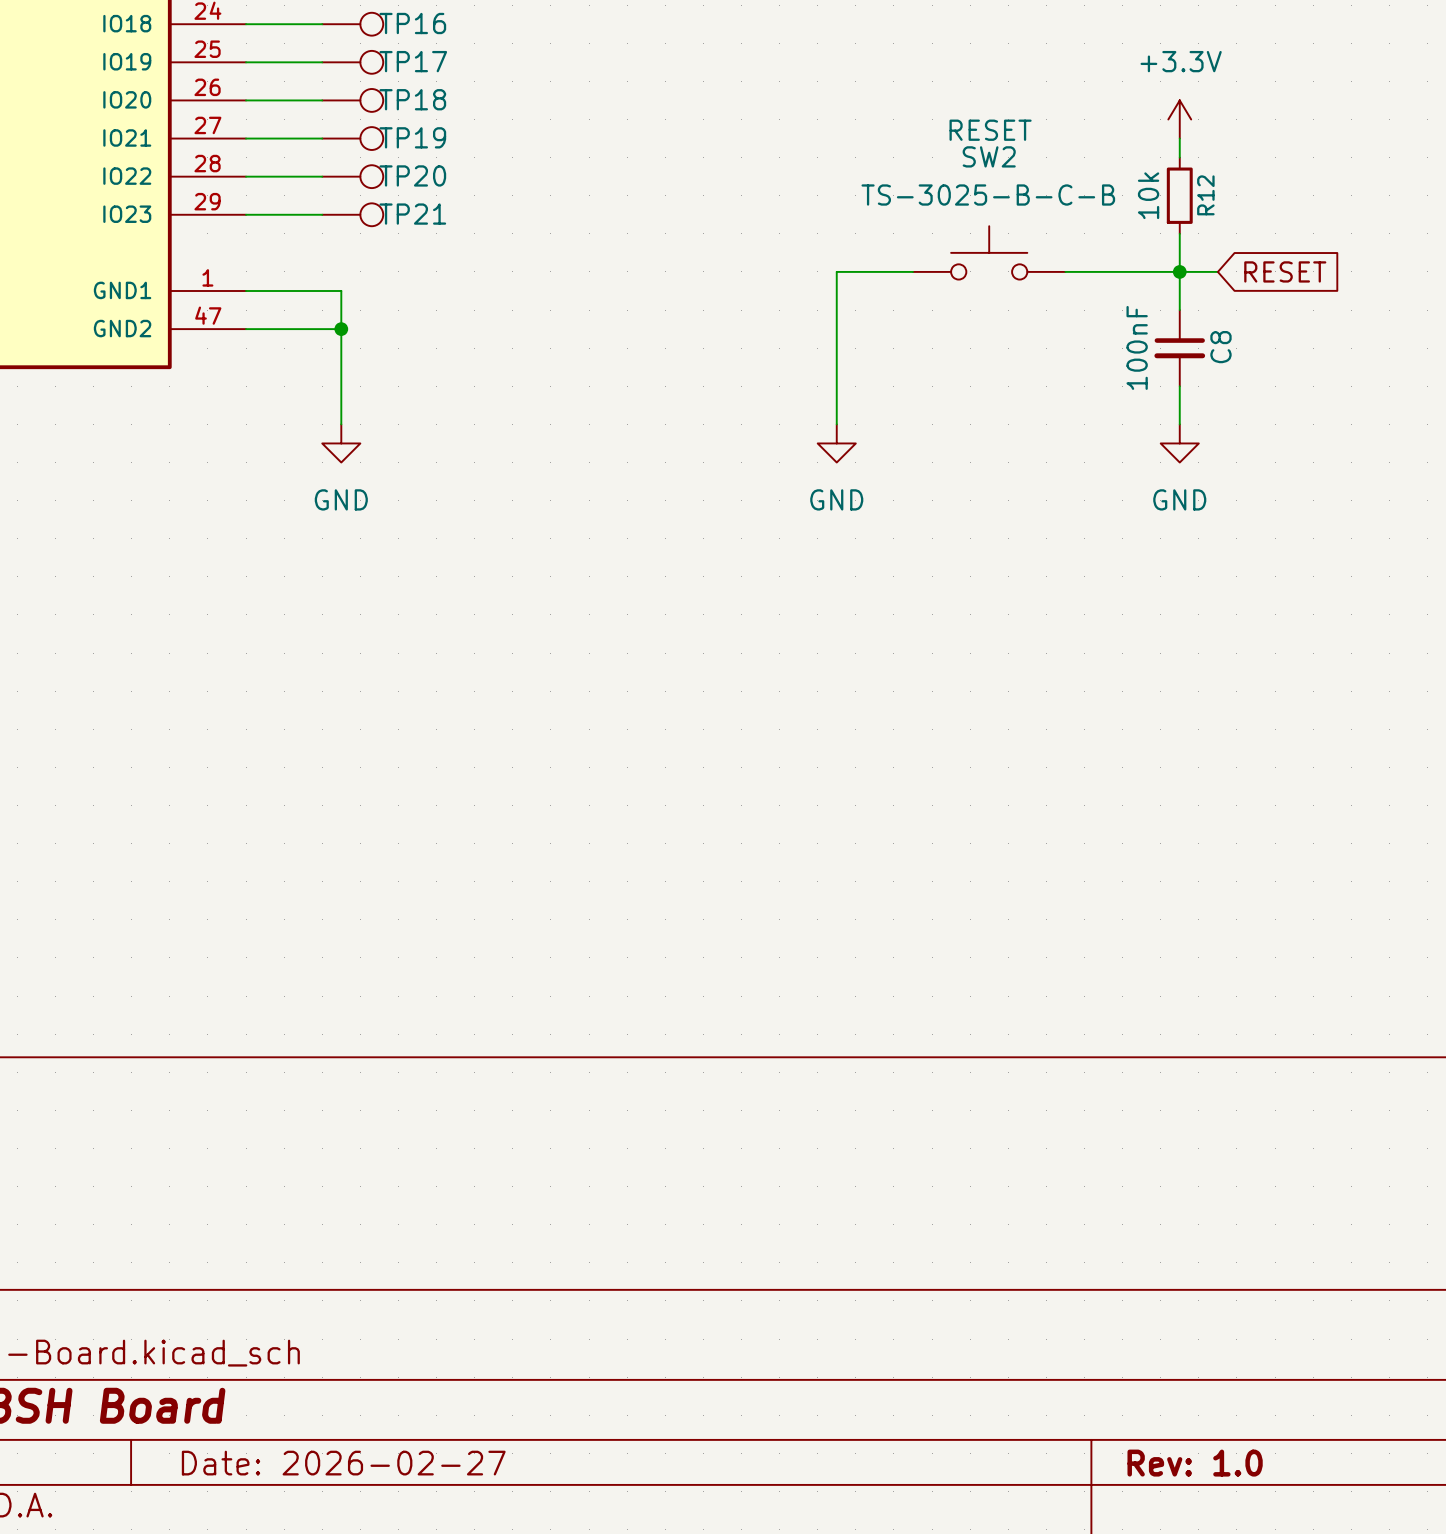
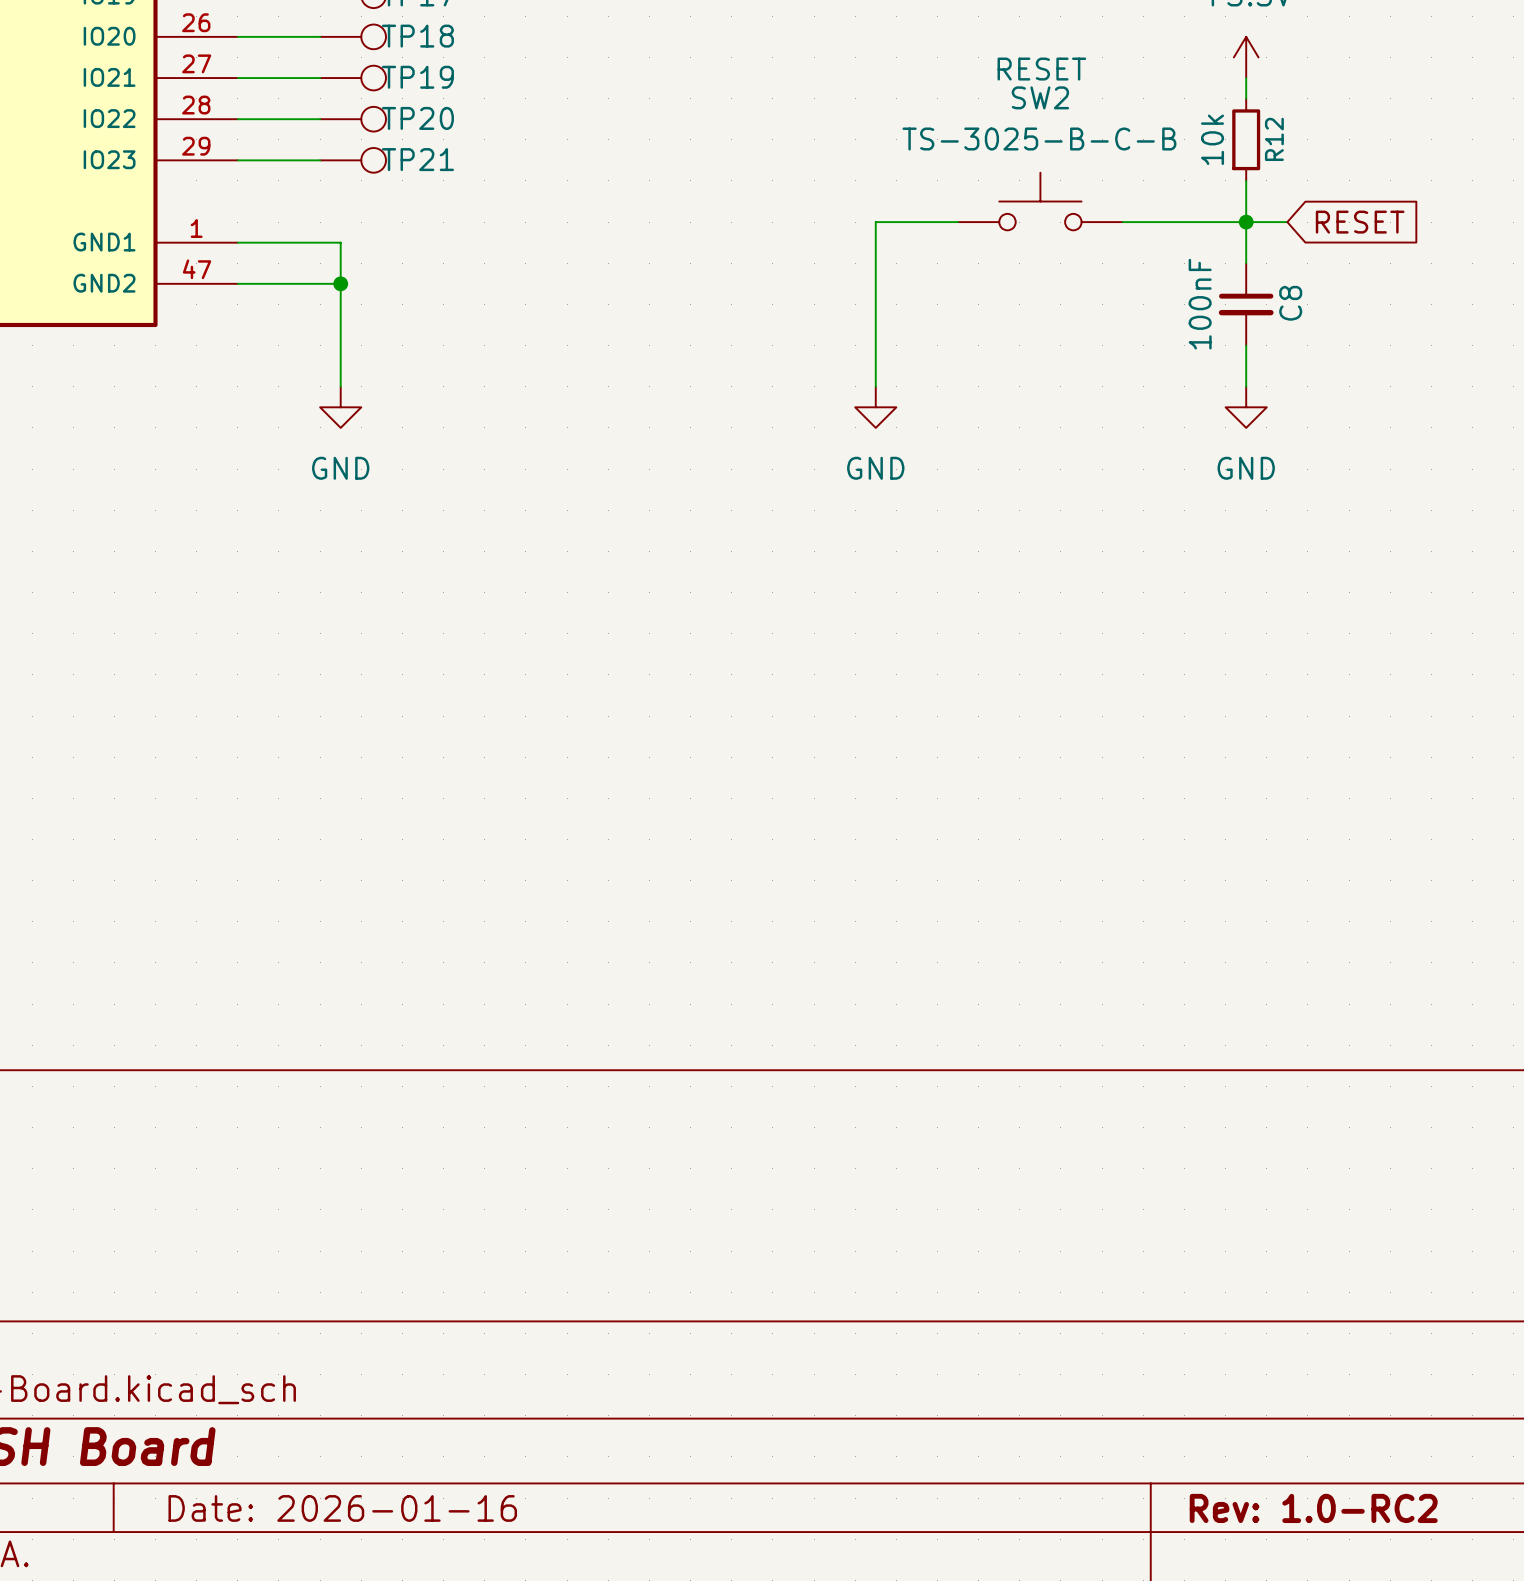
title block: Date: 2026-02-27 (343, 1463) -> Date: 2026-01-16 (342, 1508)
title block: Rev: 1.0 (1195, 1463) -> Rev: 1.0-RC2 (1313, 1508)

